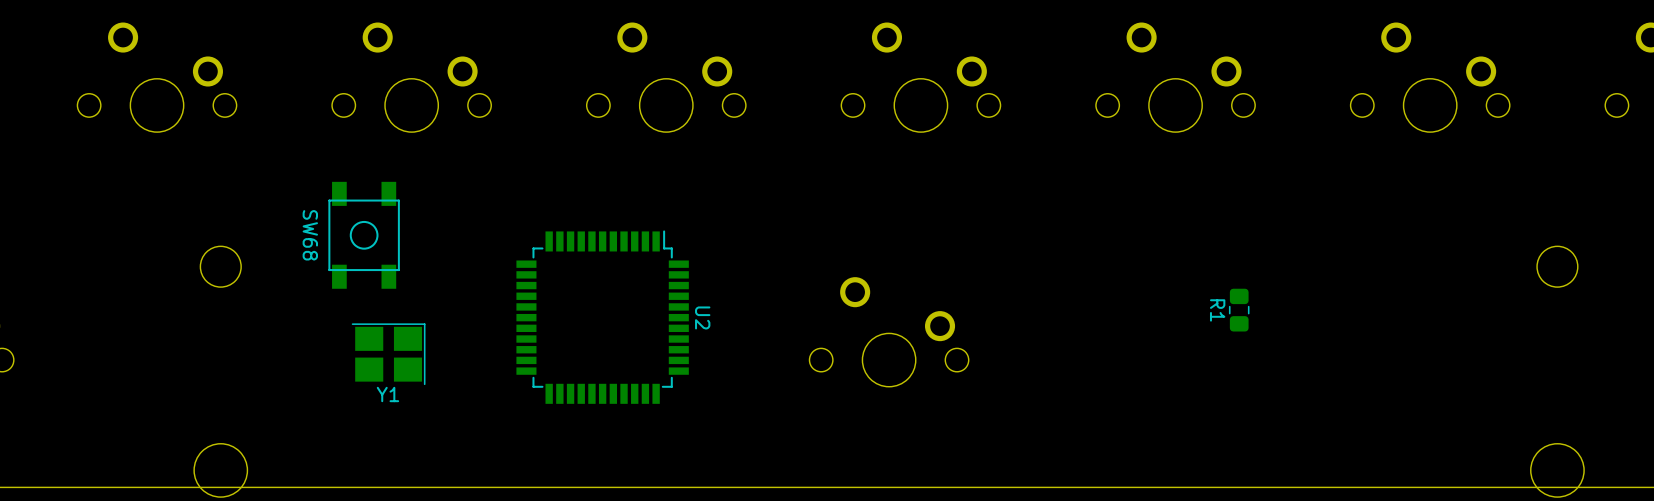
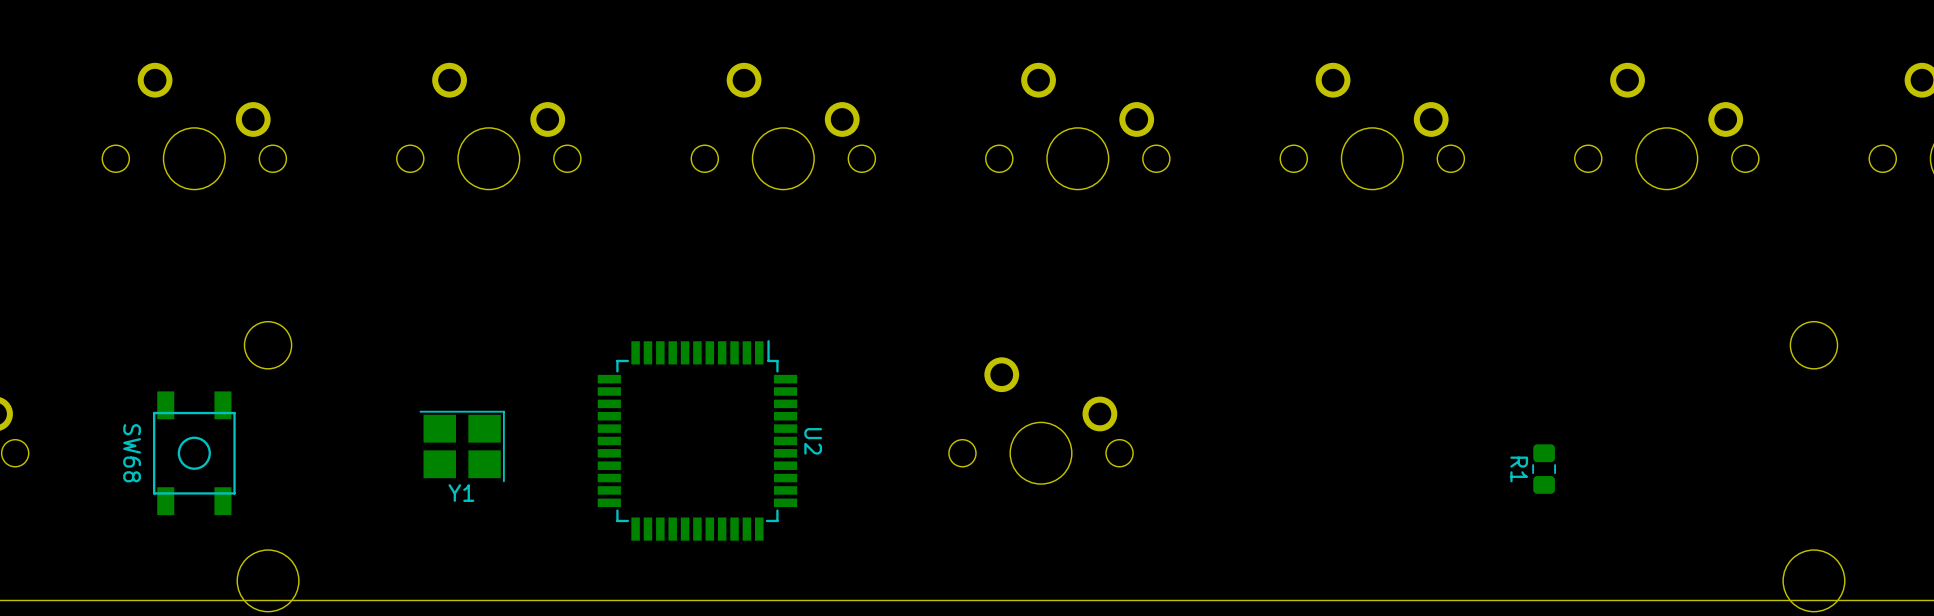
SW68 position: (364, 235) -> (194, 453)
R1 position: (1239, 310) -> (1544, 469)
U2 position: (602, 317) -> (697, 440)

